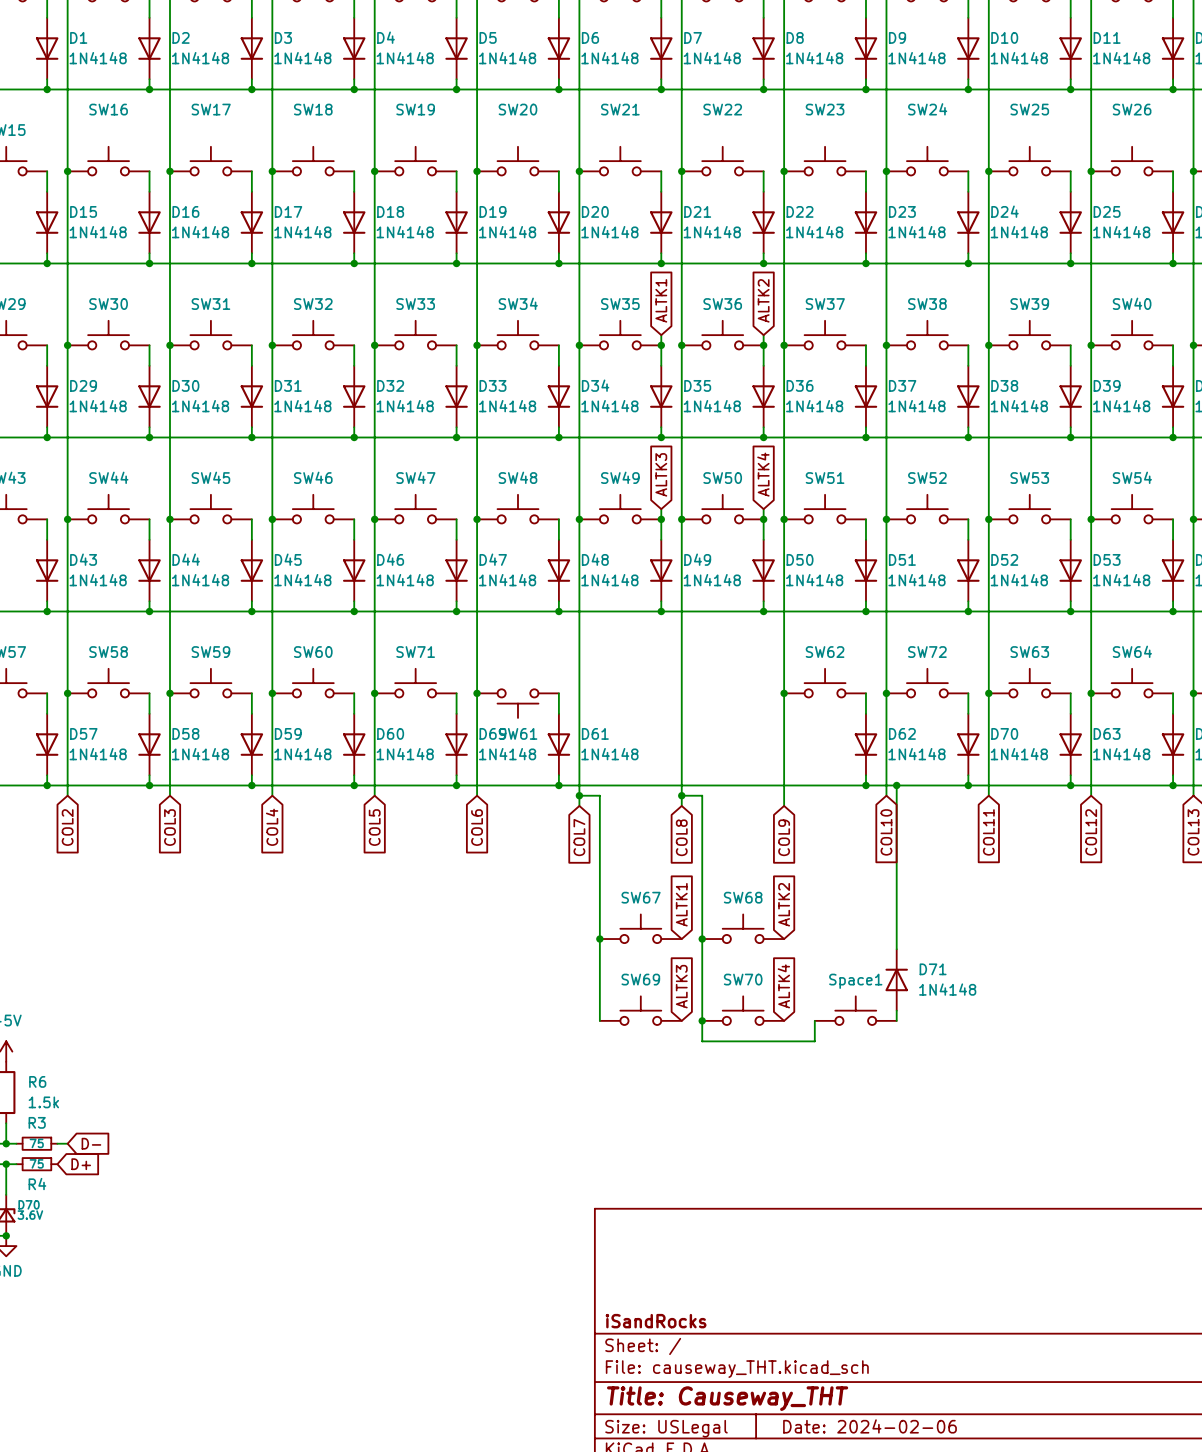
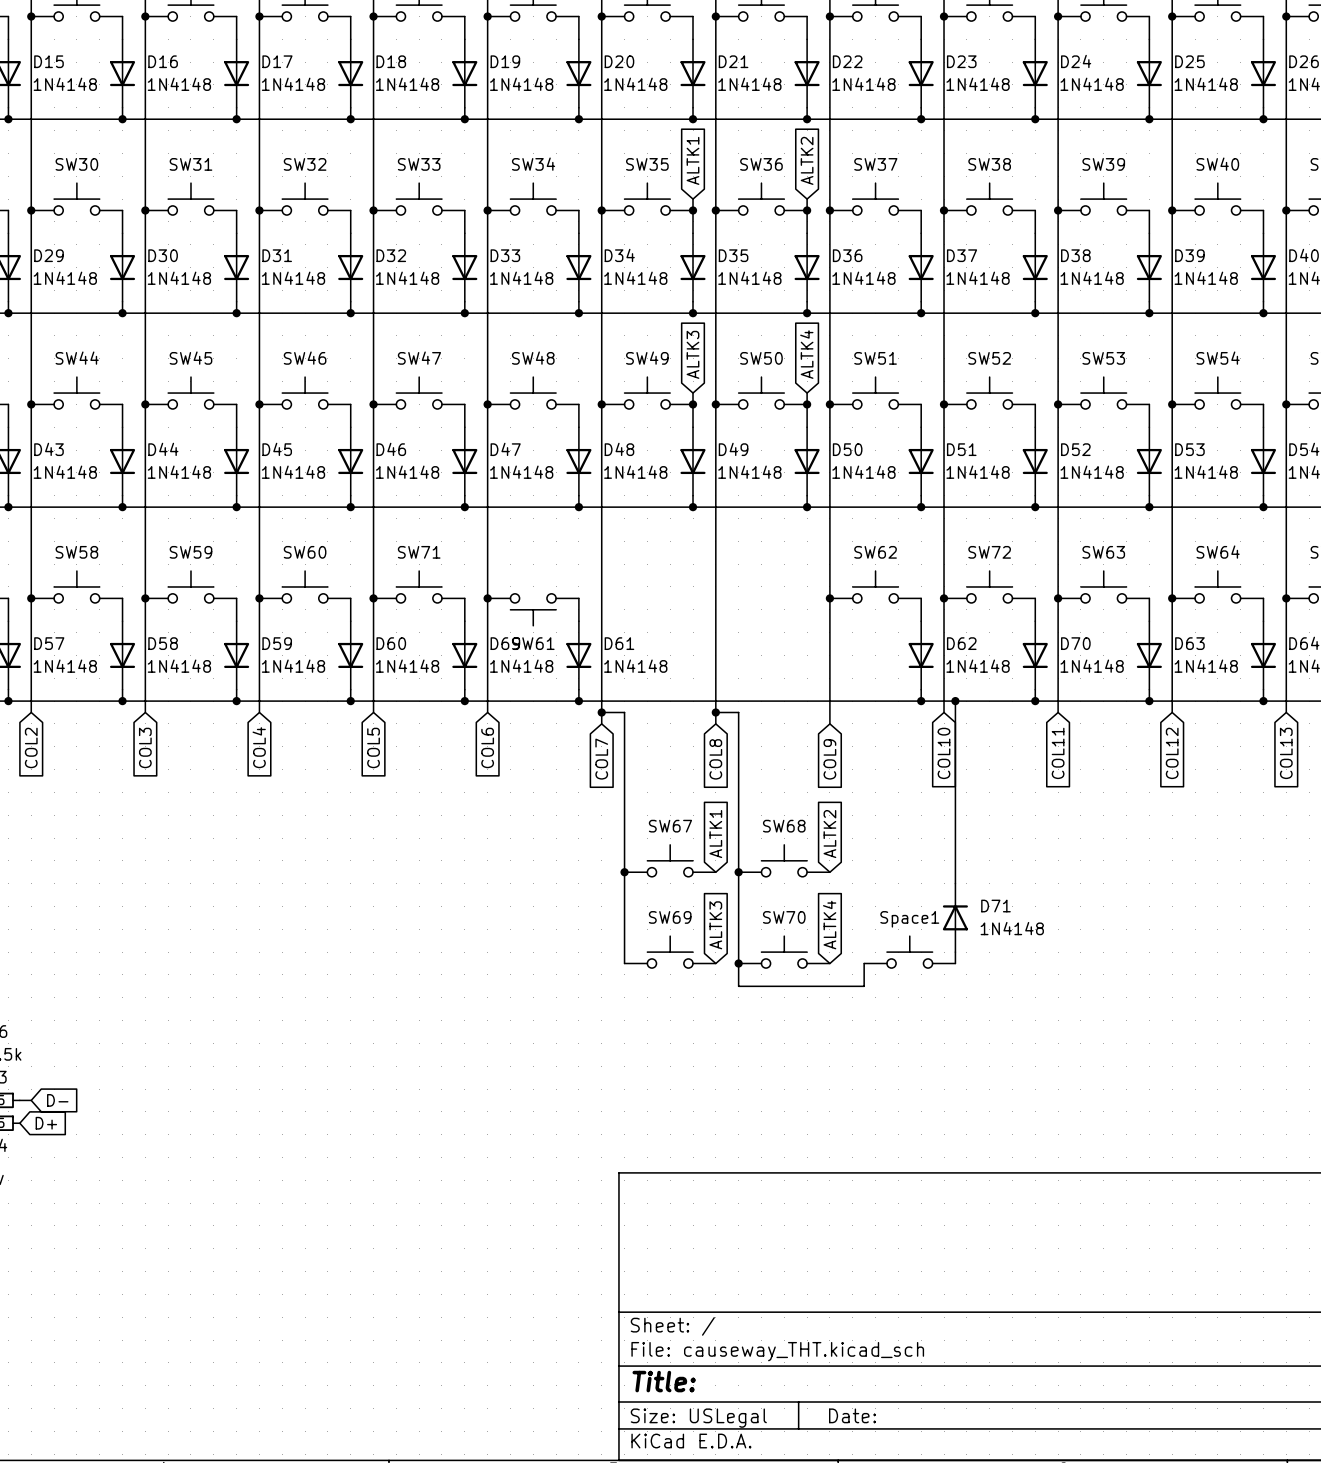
title block: iSandRocks (656, 1321) -> none
title block: Title: Causeway_THT (727, 1398) -> Title: (664, 1381)
title block: Date: 2024-02-06 (869, 1426) -> Date: (852, 1415)

